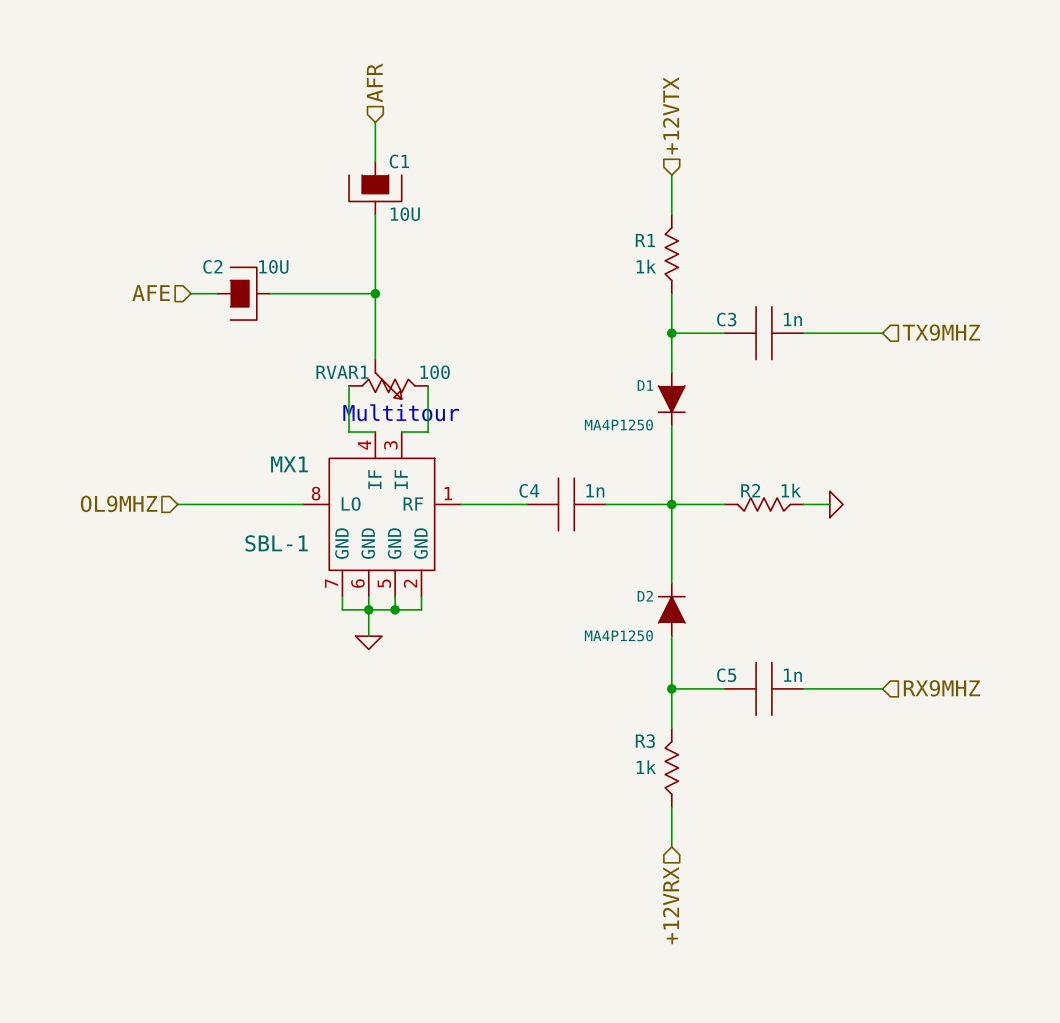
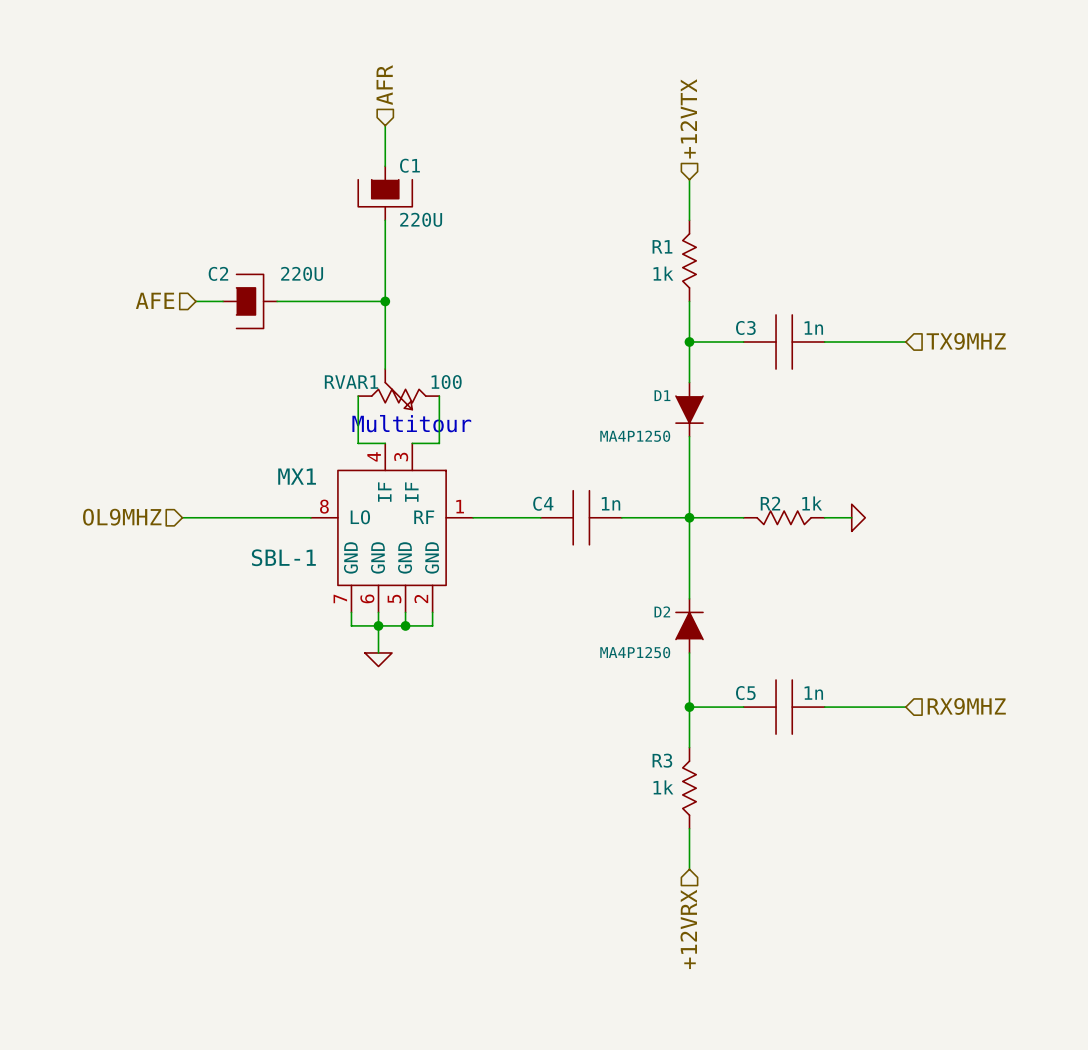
C1 value: 10U (405, 214) -> 220U (421, 219)
C2 value: 10U (273, 266) -> 220U (302, 273)

